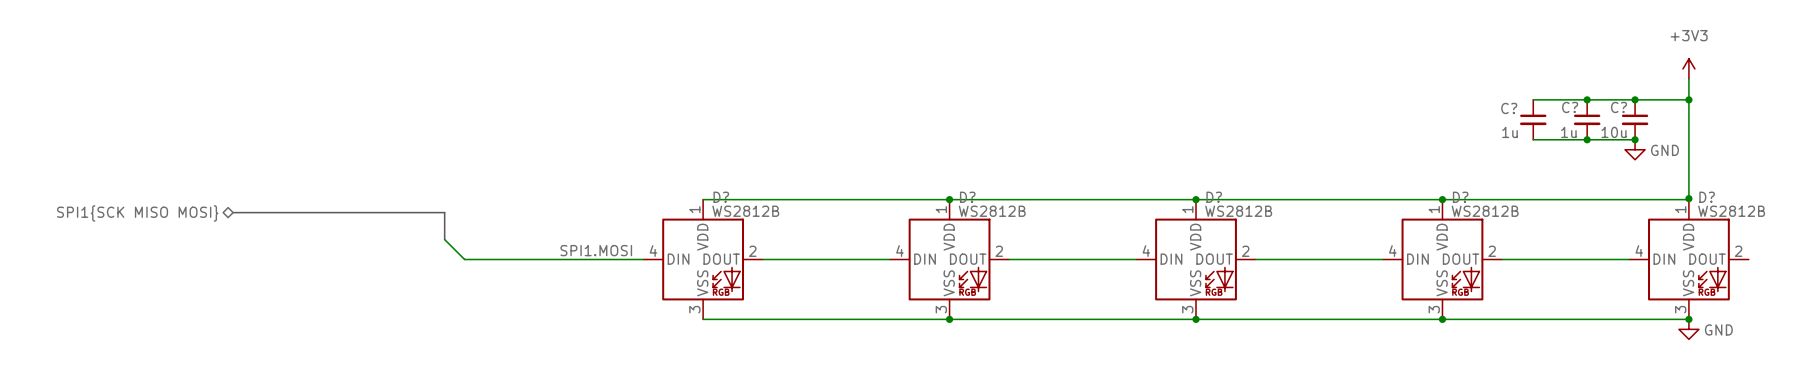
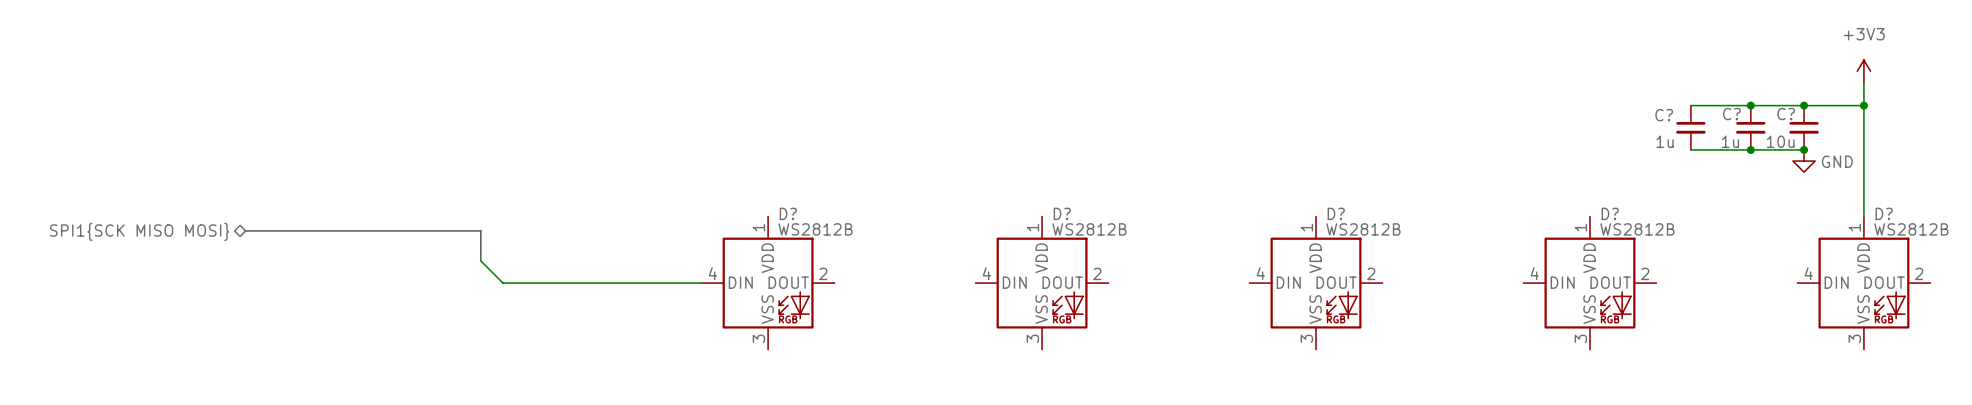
junction: (1688, 198) -> none
wire: (703, 199) (1688, 199) -> none
junction: (949, 199) -> none
junction: (1196, 199) -> none
junction: (1442, 199) -> none
label: SPI1.MOSI (596, 250) -> none
wire: (762, 259) (889, 259) -> none
wire: (1009, 259) (1136, 259) -> none
wire: (1255, 259) (1382, 259) -> none
wire: (1502, 259) (1629, 259) -> none
wire: (703, 319) (1688, 319) -> none
junction: (949, 319) -> none
junction: (1196, 319) -> none
junction: (1442, 319) -> none
junction: (1688, 319) -> none
power symbol: GND (1688, 329) -> none

